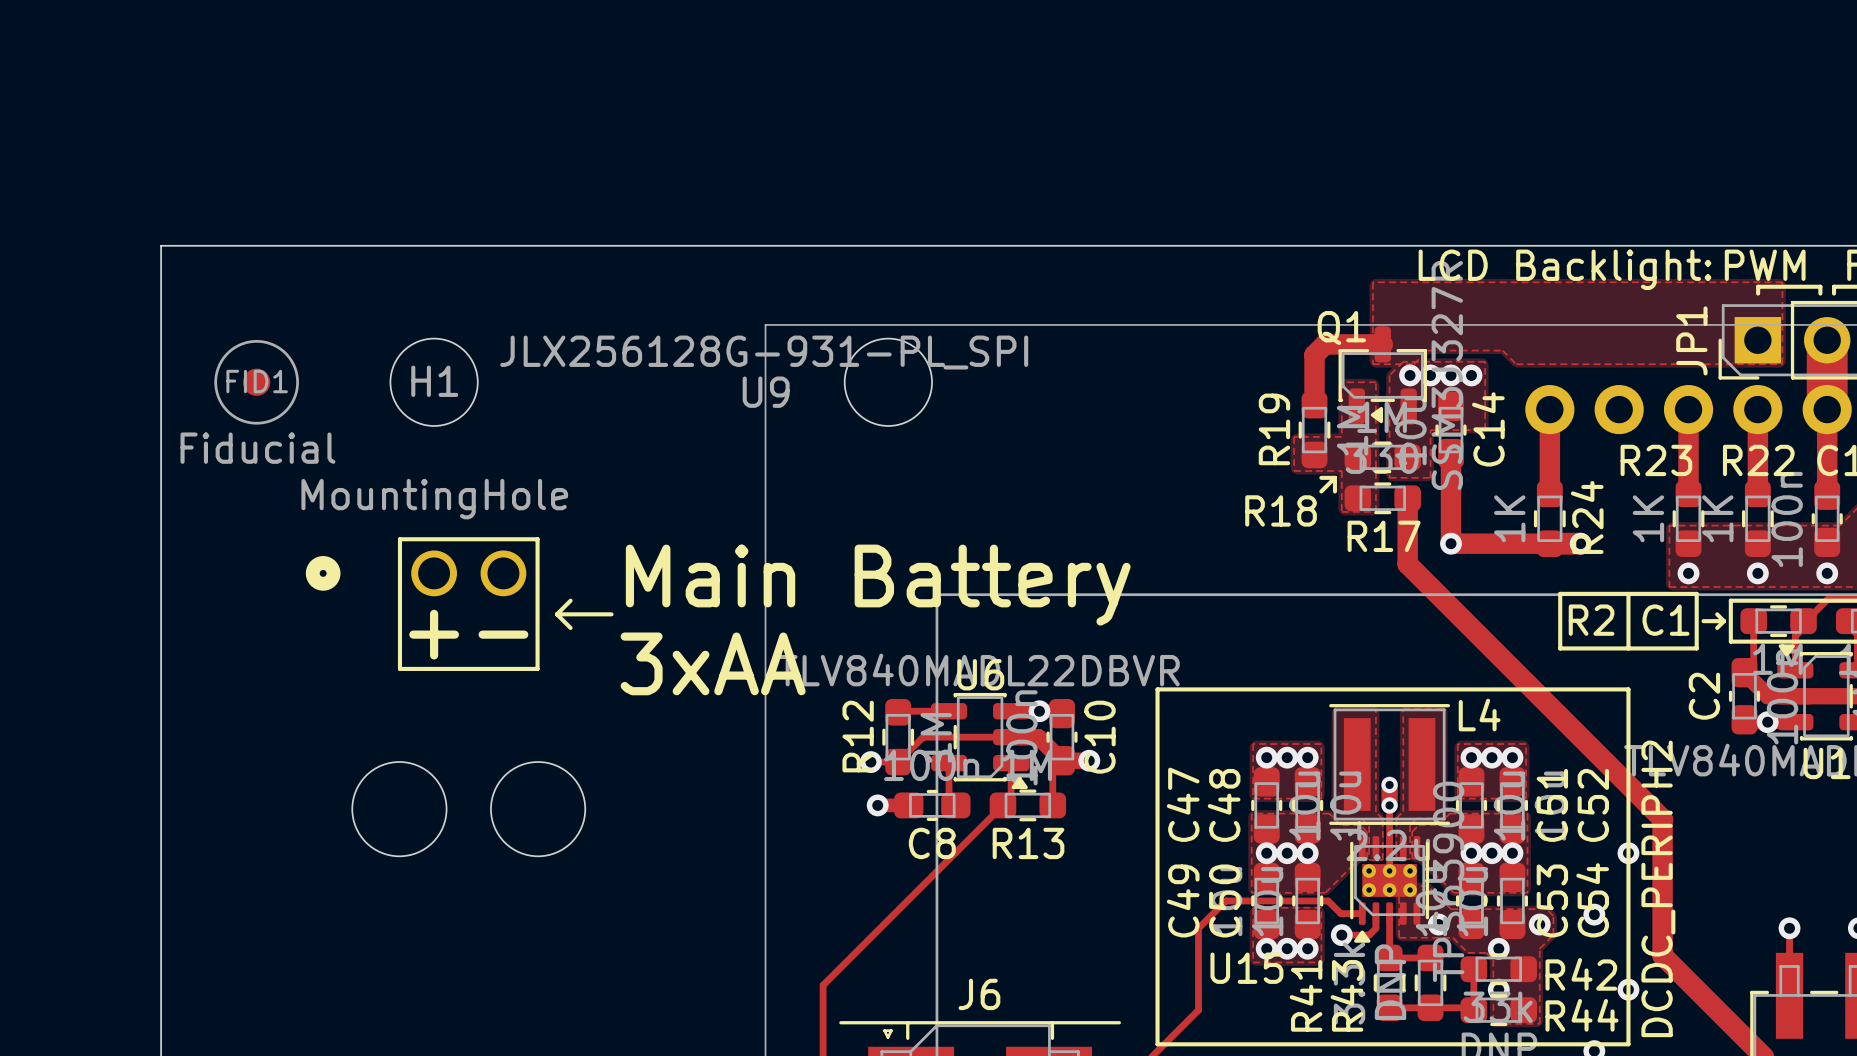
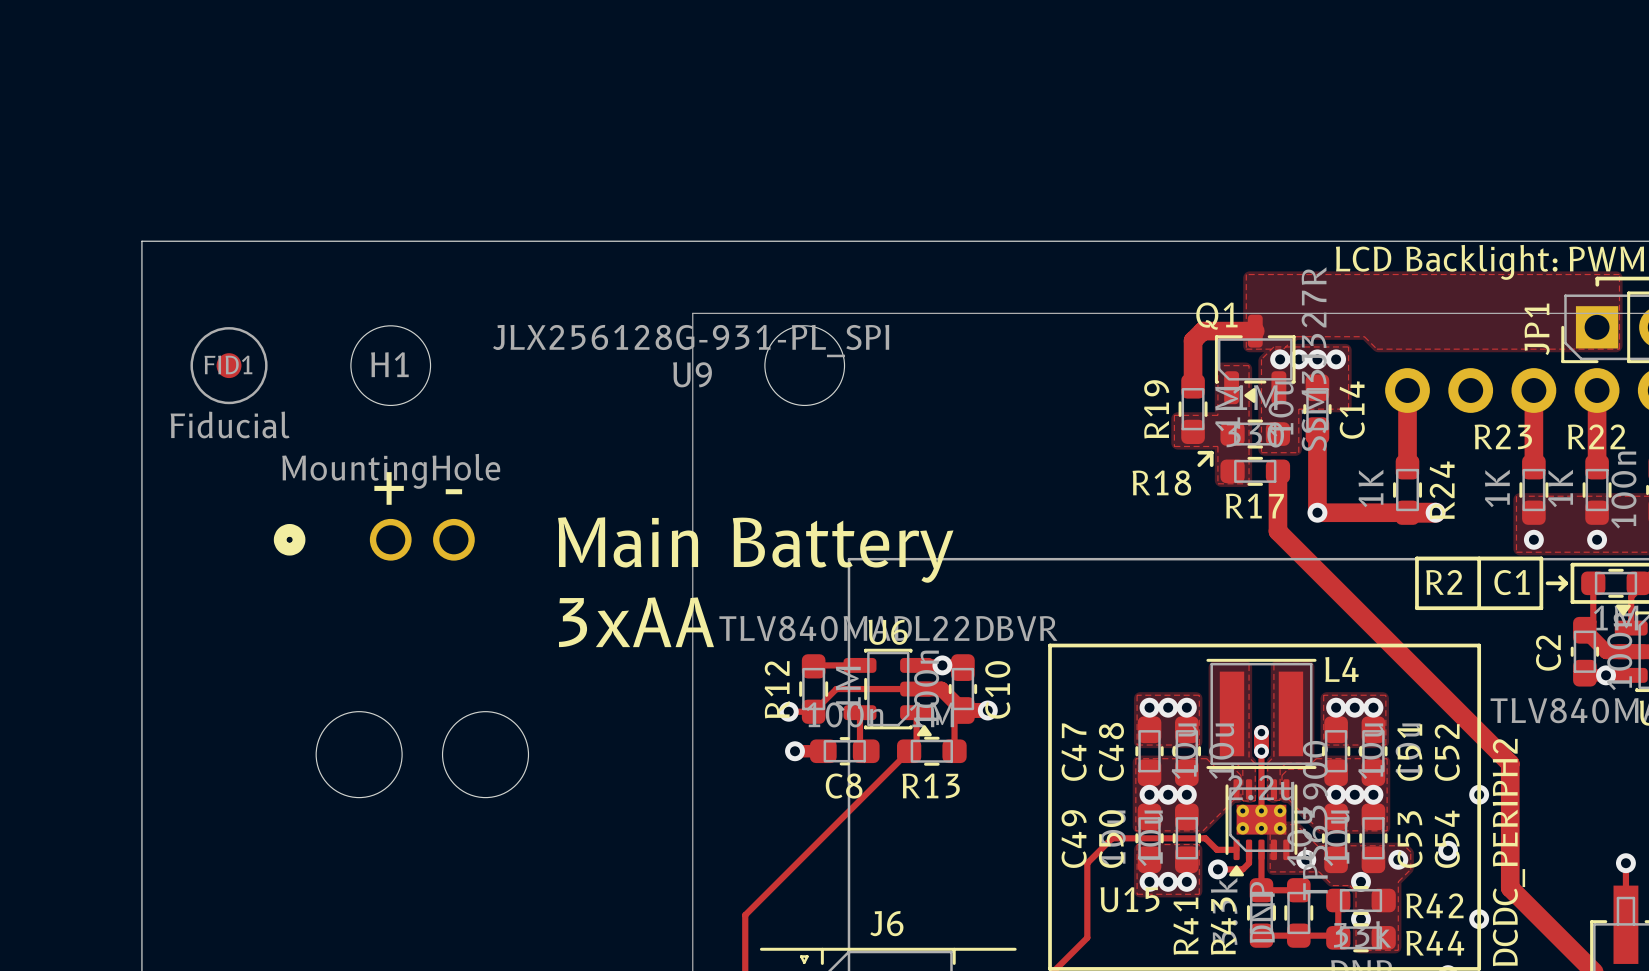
line: (399, 539) (537, 539) (537, 668) (399, 668) (399, 539) -> none
line: (570, 600) (556, 614) -> none
line: (556, 614) (570, 627) -> none
line: (556, 614) (611, 614) -> none
text position: + (434, 634) -> + (389, 488)
text position: - (503, 634) -> - (453, 491)

